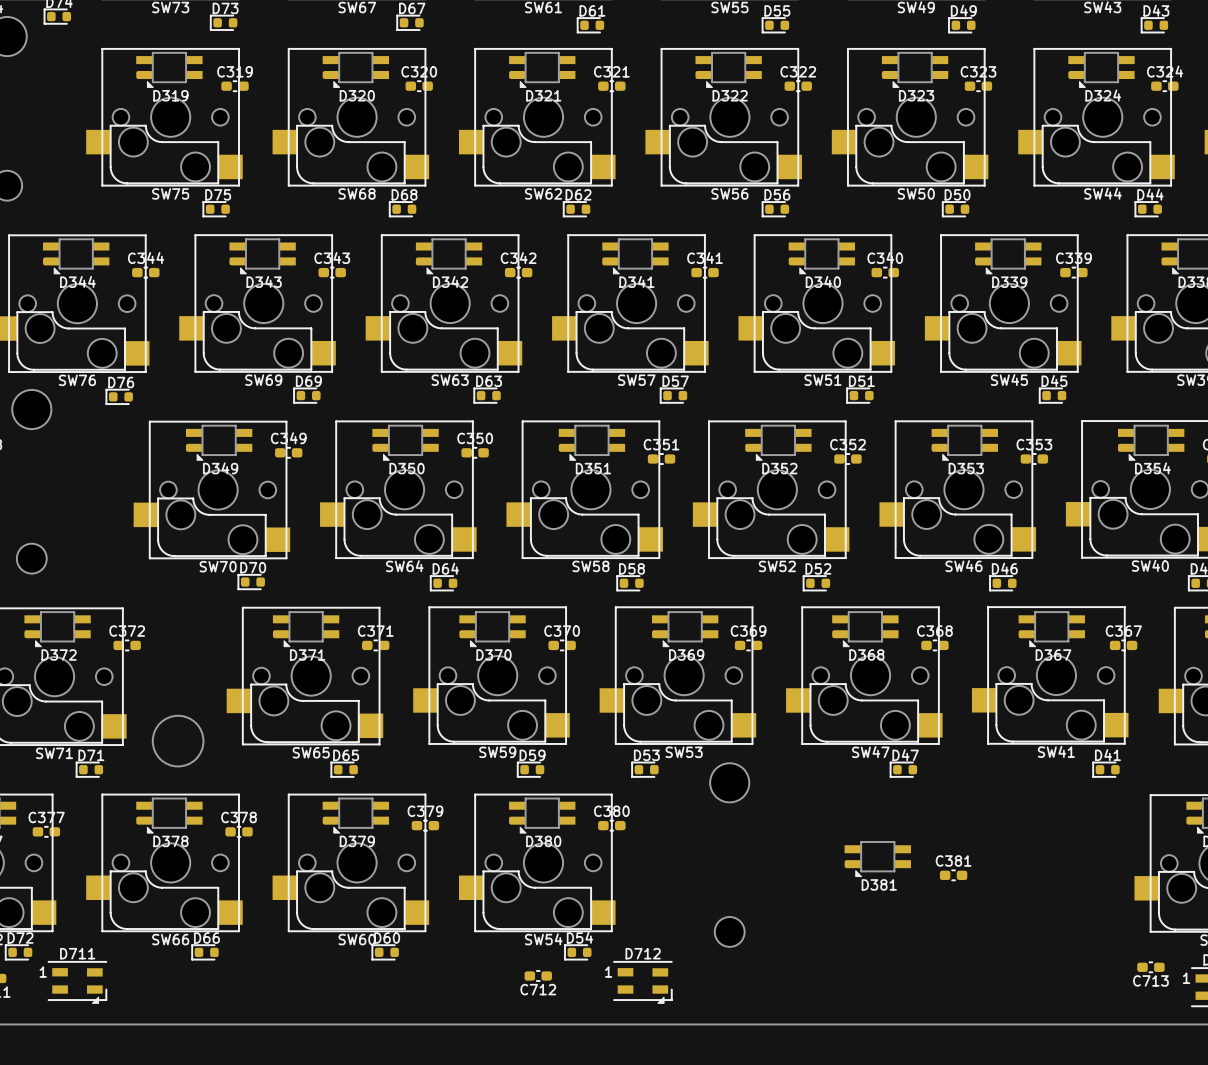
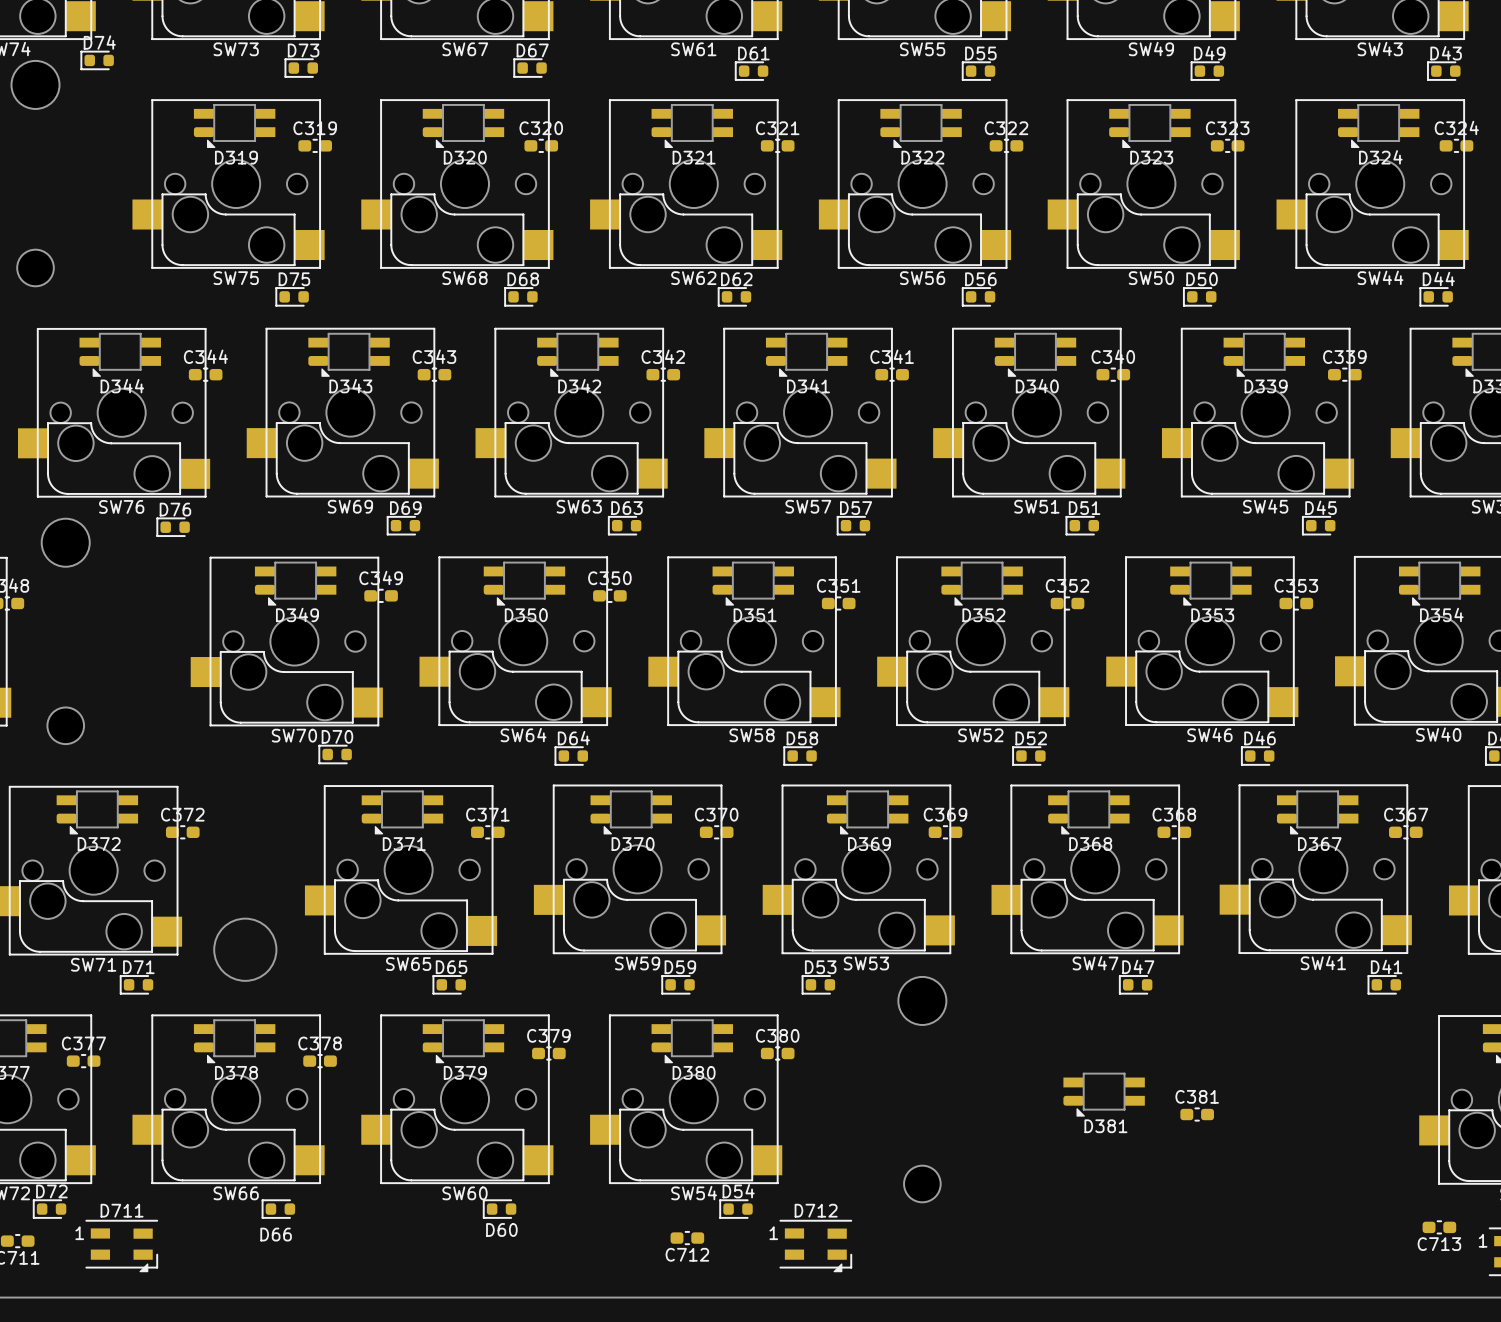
D66 name position: D66 (206, 938) -> D66 (276, 1234)
D60 name position: D60 (387, 938) -> D60 (501, 1229)

